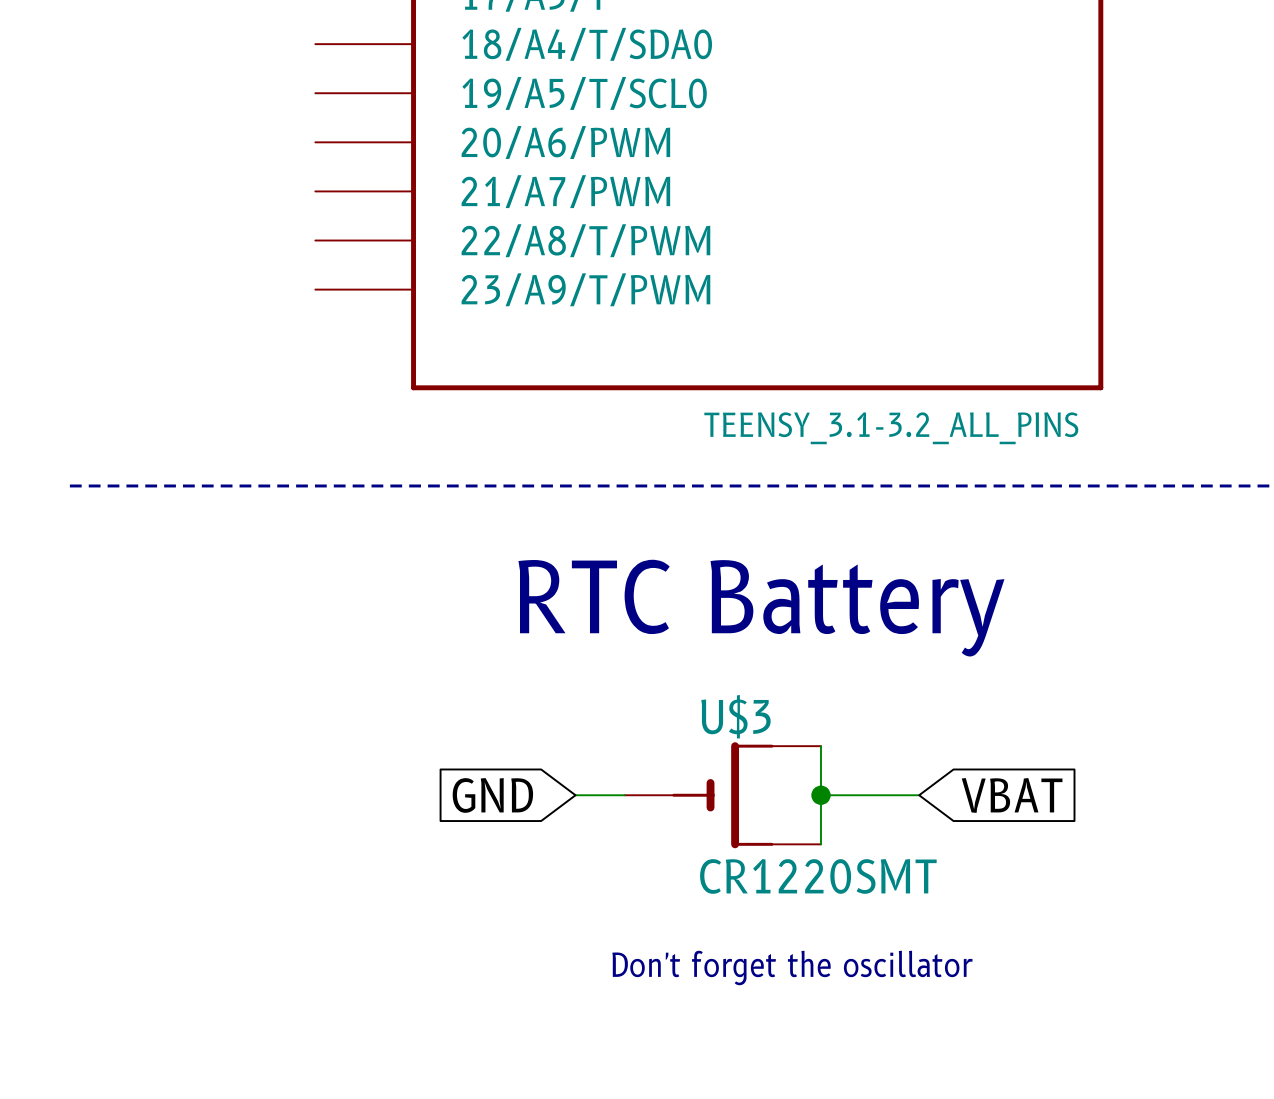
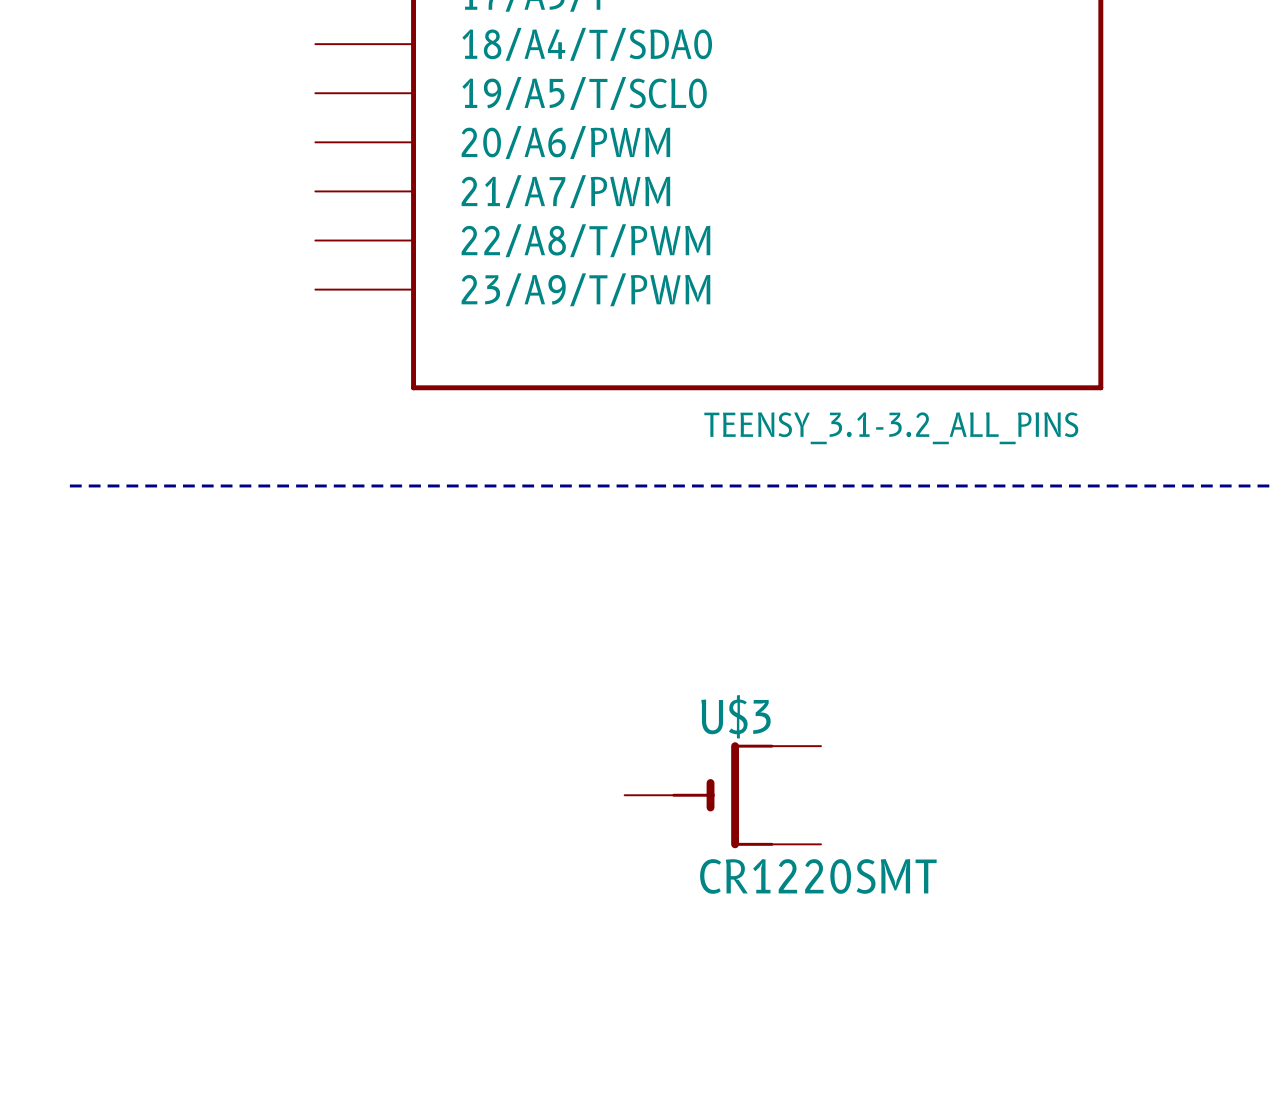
text: RTC Battery (761, 608) -> none
wire: (820, 746) (820, 844) -> none
global label: GND (492, 795) -> none
wire: (575, 795) (624, 795) -> none
wire: (820, 795) (919, 795) -> none
junction: (820, 795) -> none
global label: VBAT (1012, 795) -> none
text: Don't forget the oscillator (792, 967) -> none

